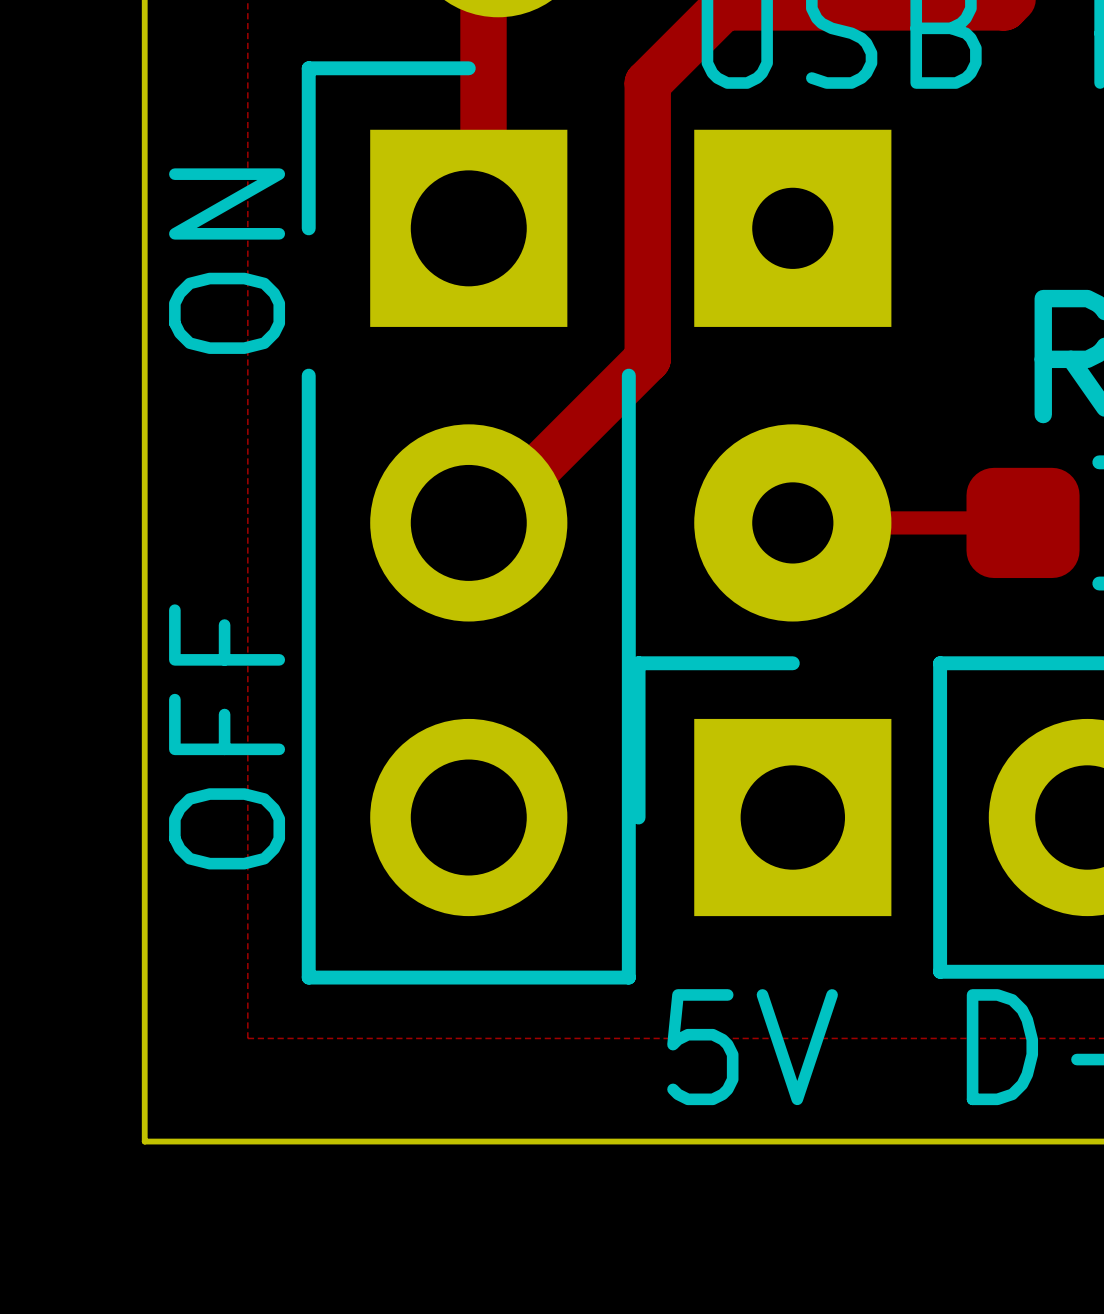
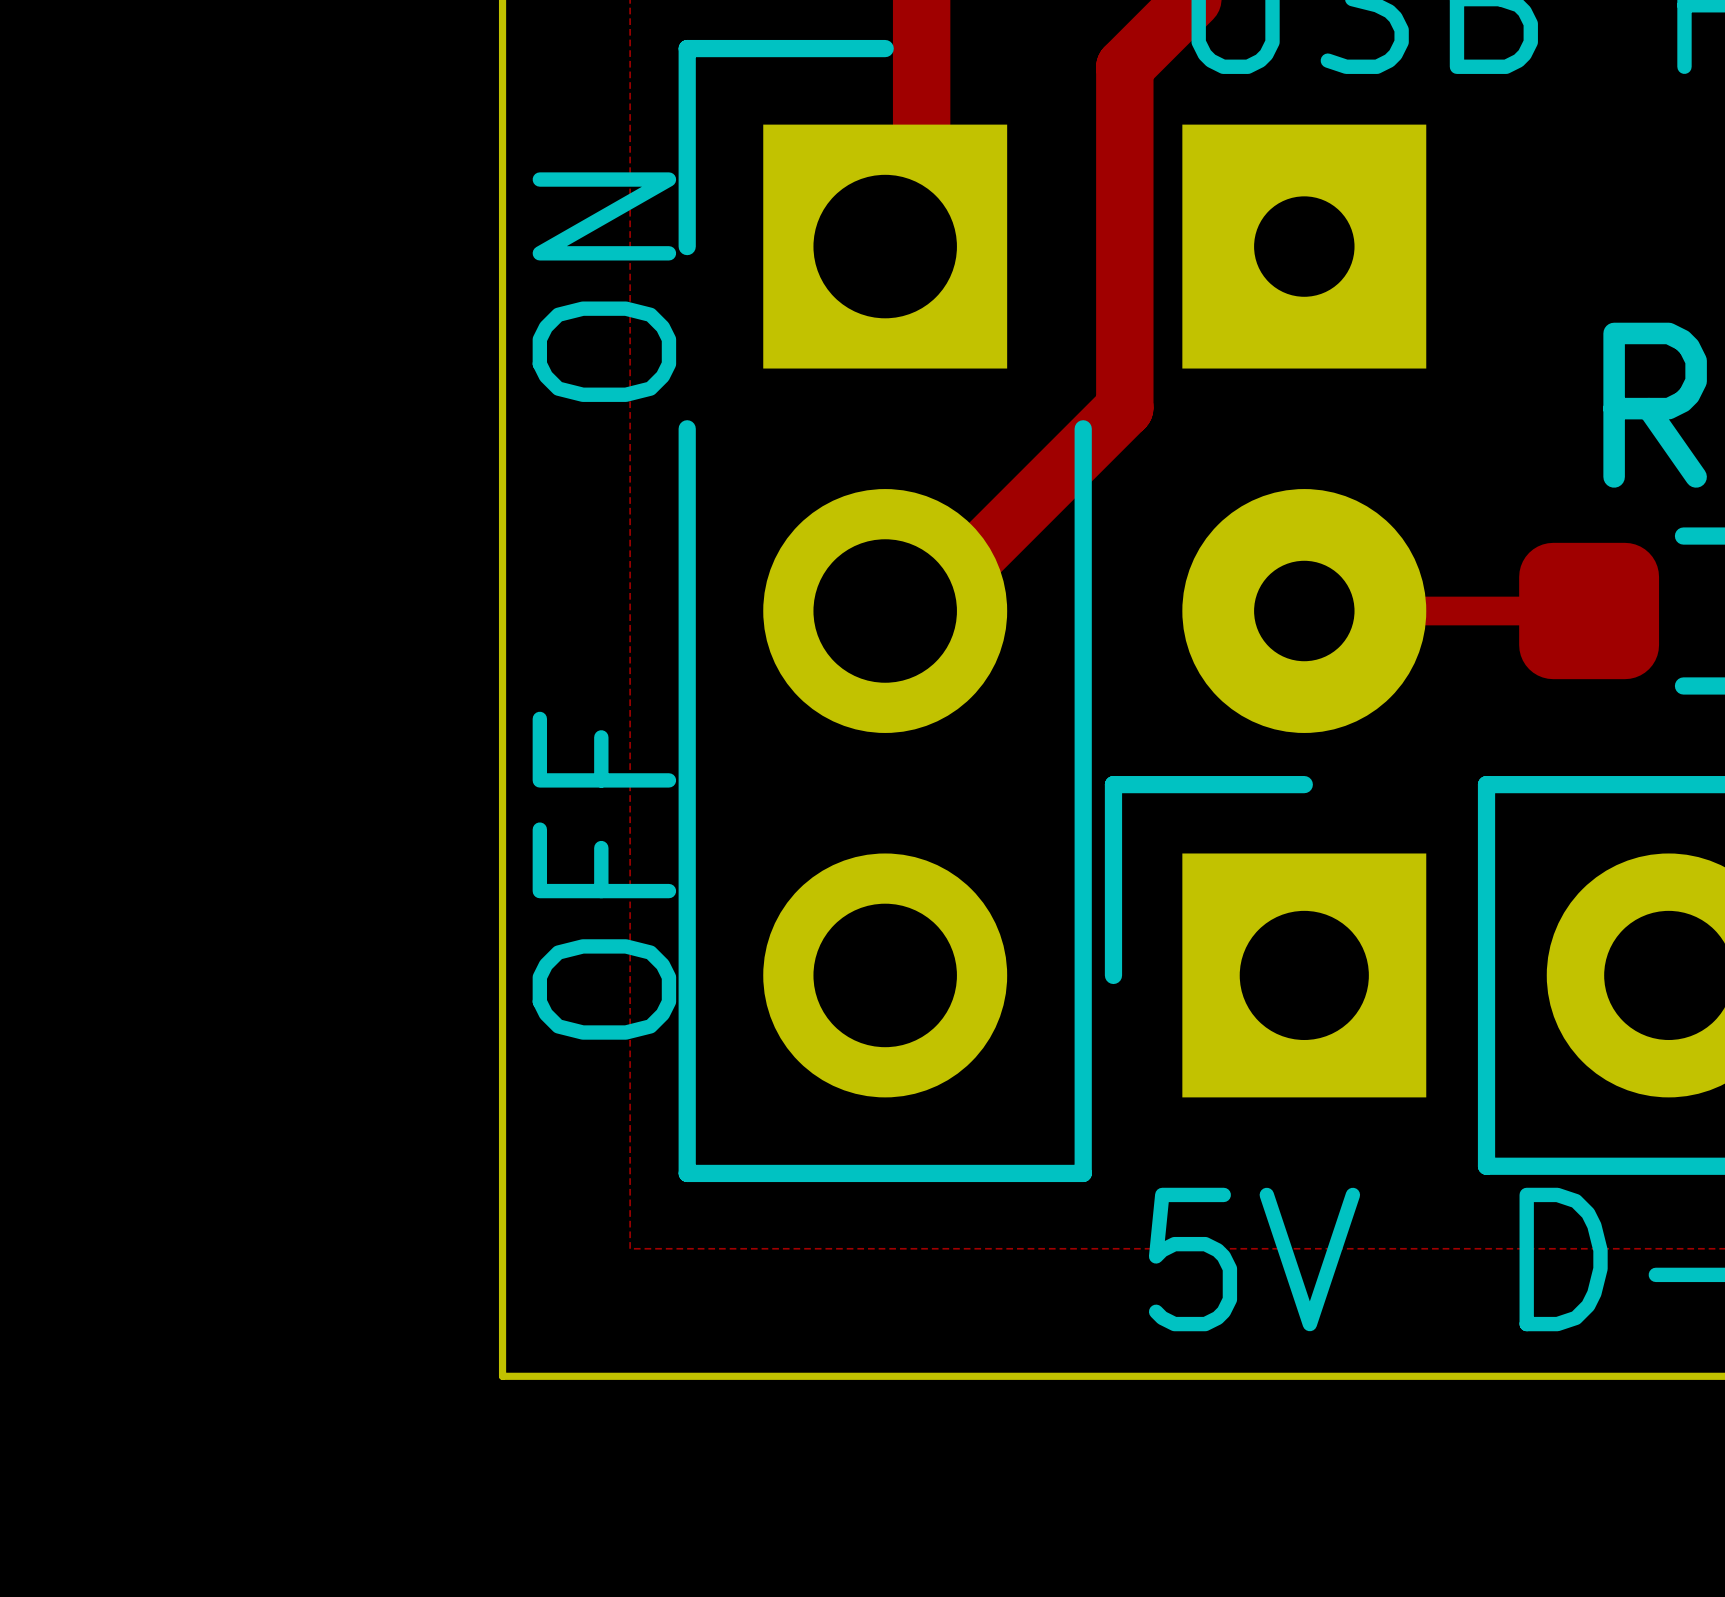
part position: (468, 522) -> (885, 611)

